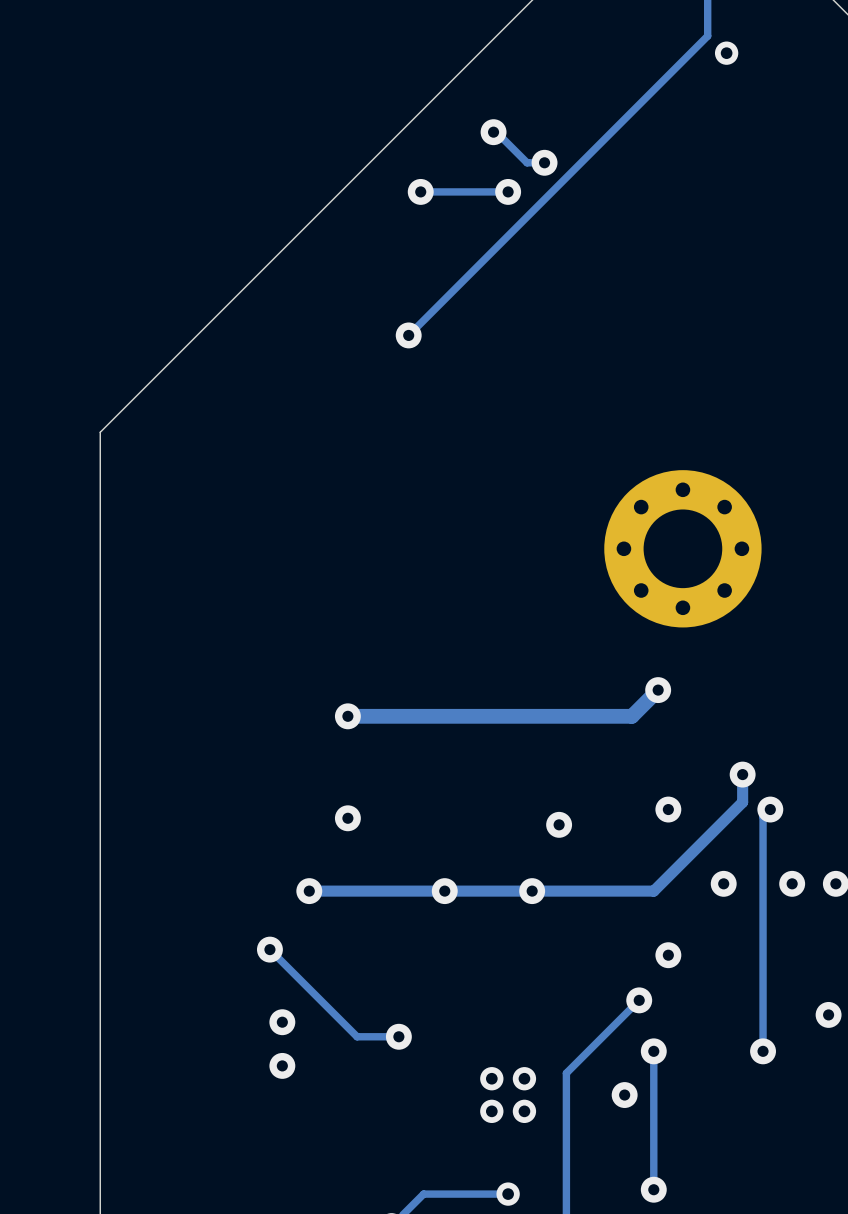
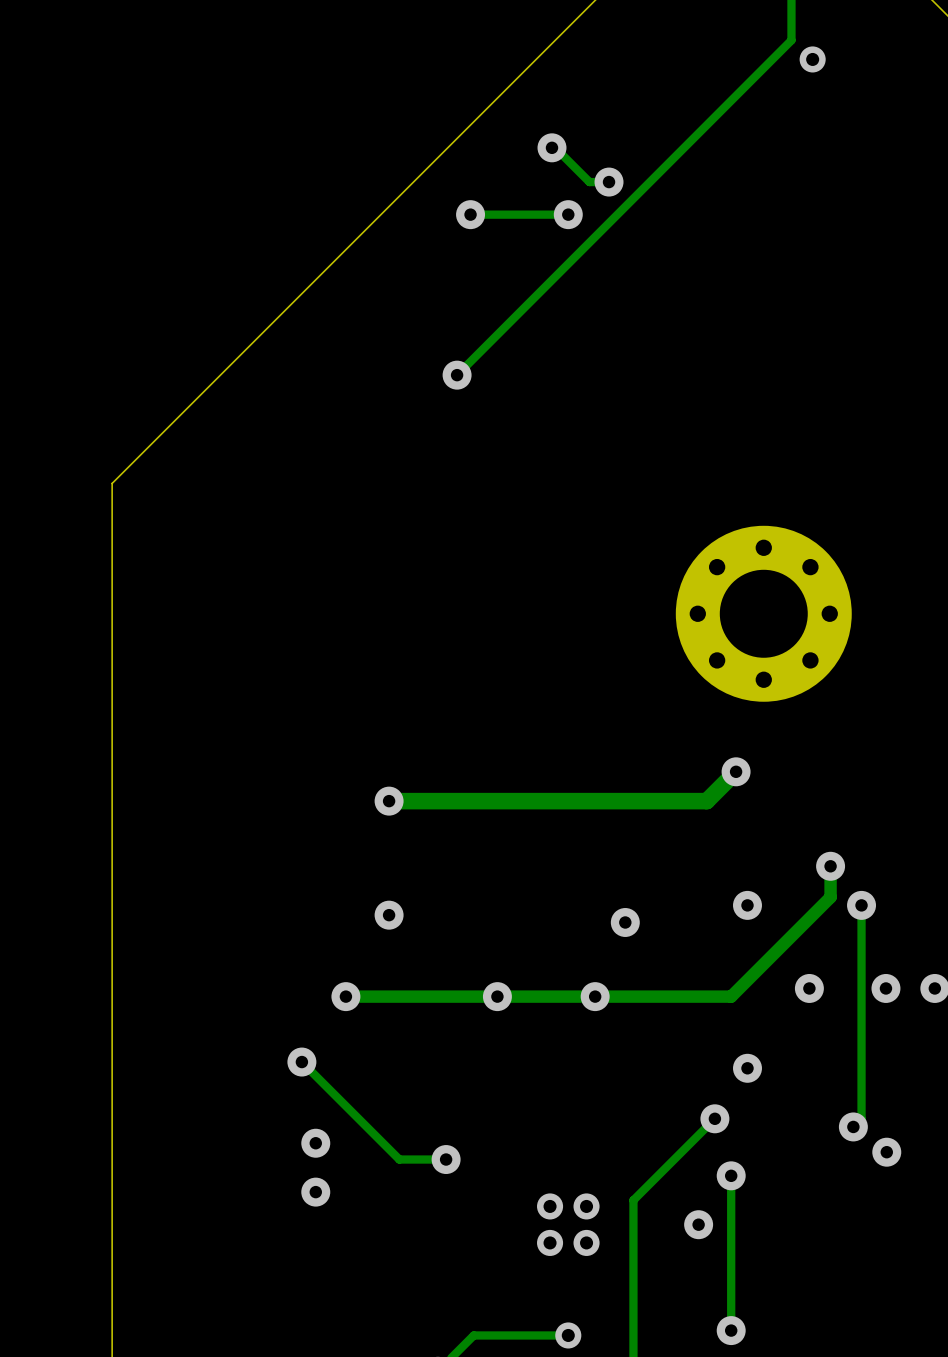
track: (770, 809) (763, 816) (763, 1051) -> (861, 905) (861, 1118) (853, 1126)
via: none -> (853, 1126)
via: (828, 1014) -> none
via: none -> (886, 1152)
via: (763, 1051) -> none

